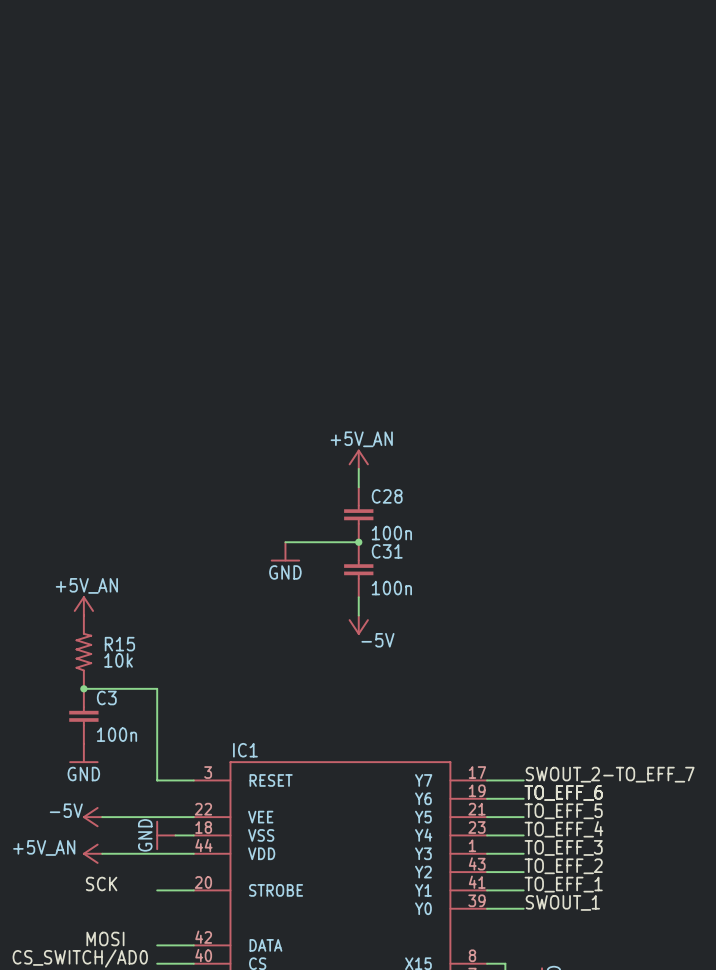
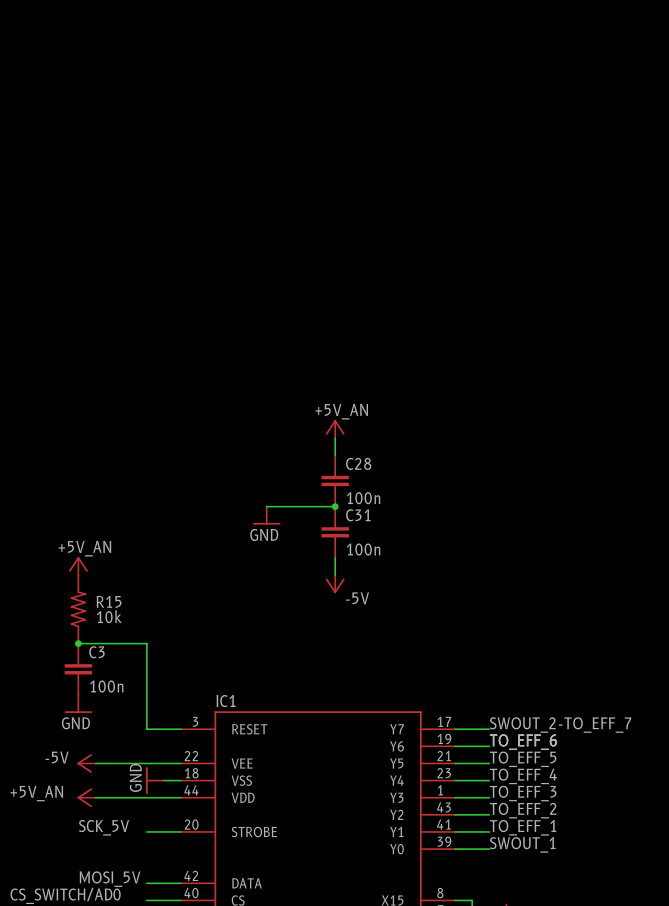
label: SCK (101, 884) -> SCK_5V (104, 827)
label: MOSI (105, 938) -> MOSI_5V (110, 879)

